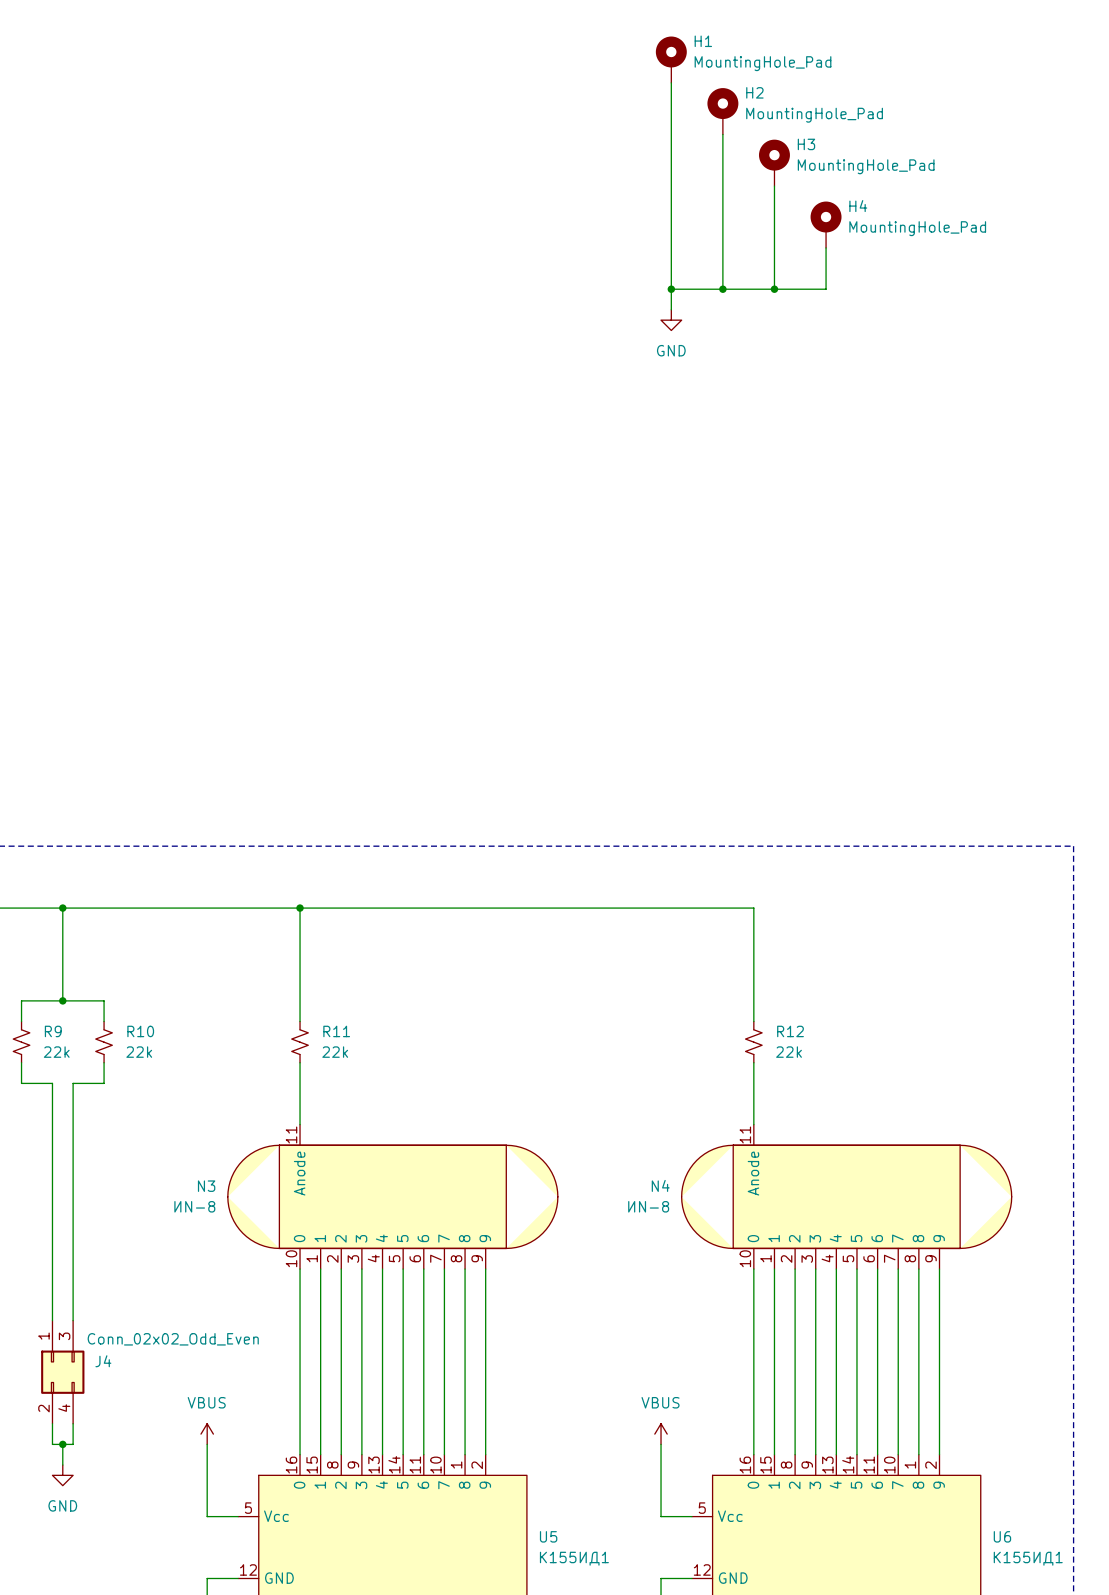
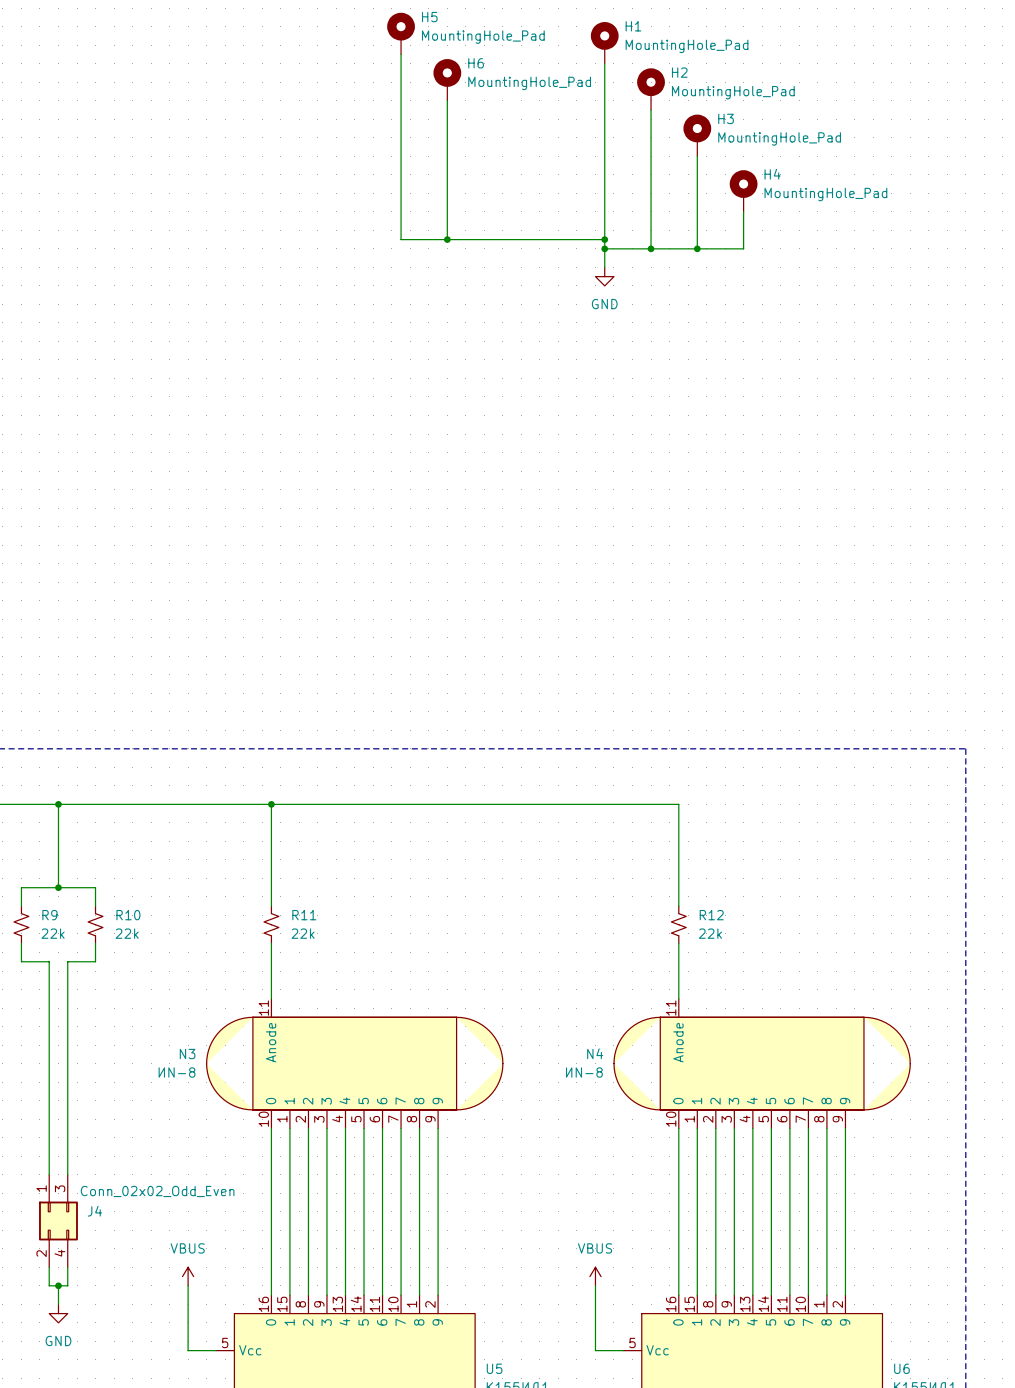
H5: none -> MountingHole_Pad (401, 33)
wire: none -> (401, 54) (401, 239) (604, 239)
H6: none -> MountingHole_Pad (447, 79)
wire: none -> (447, 100) (447, 239)
junction: none -> (447, 239)
junction: none -> (604, 239)

